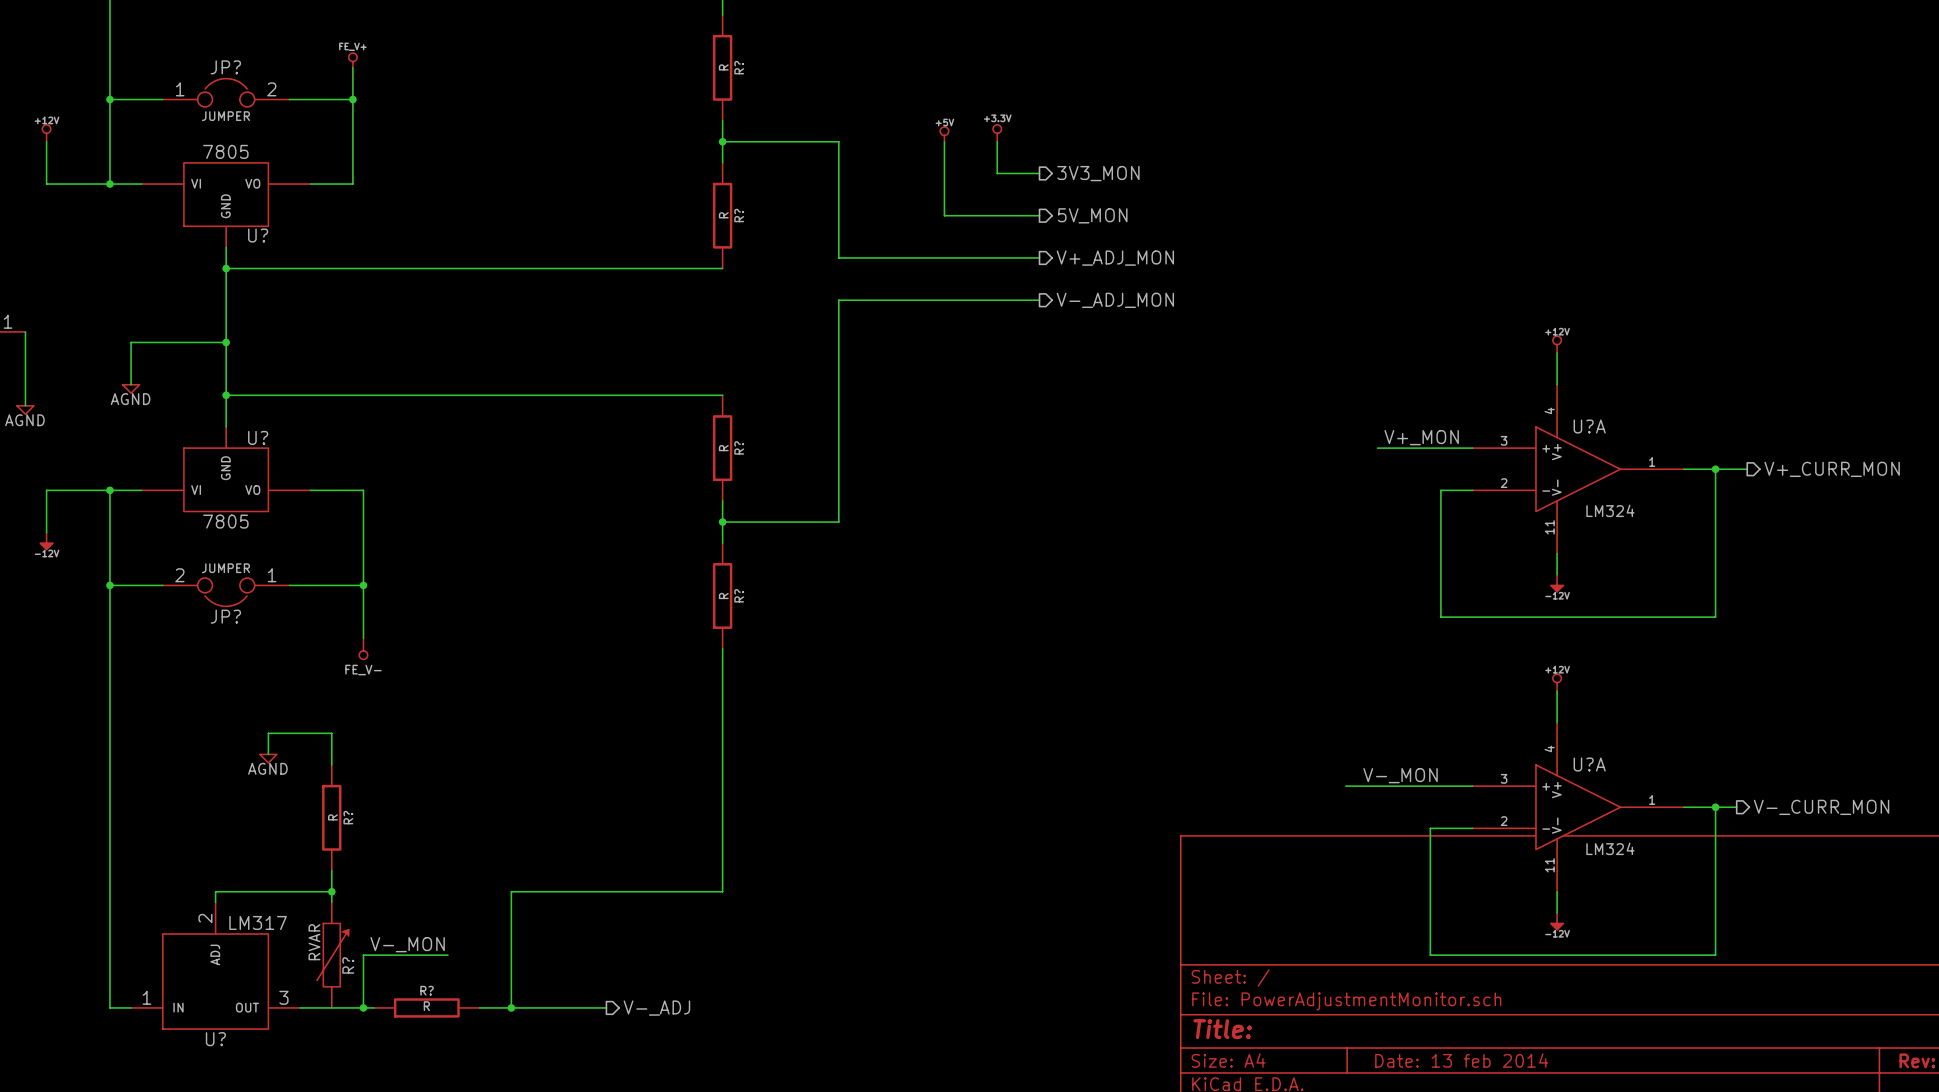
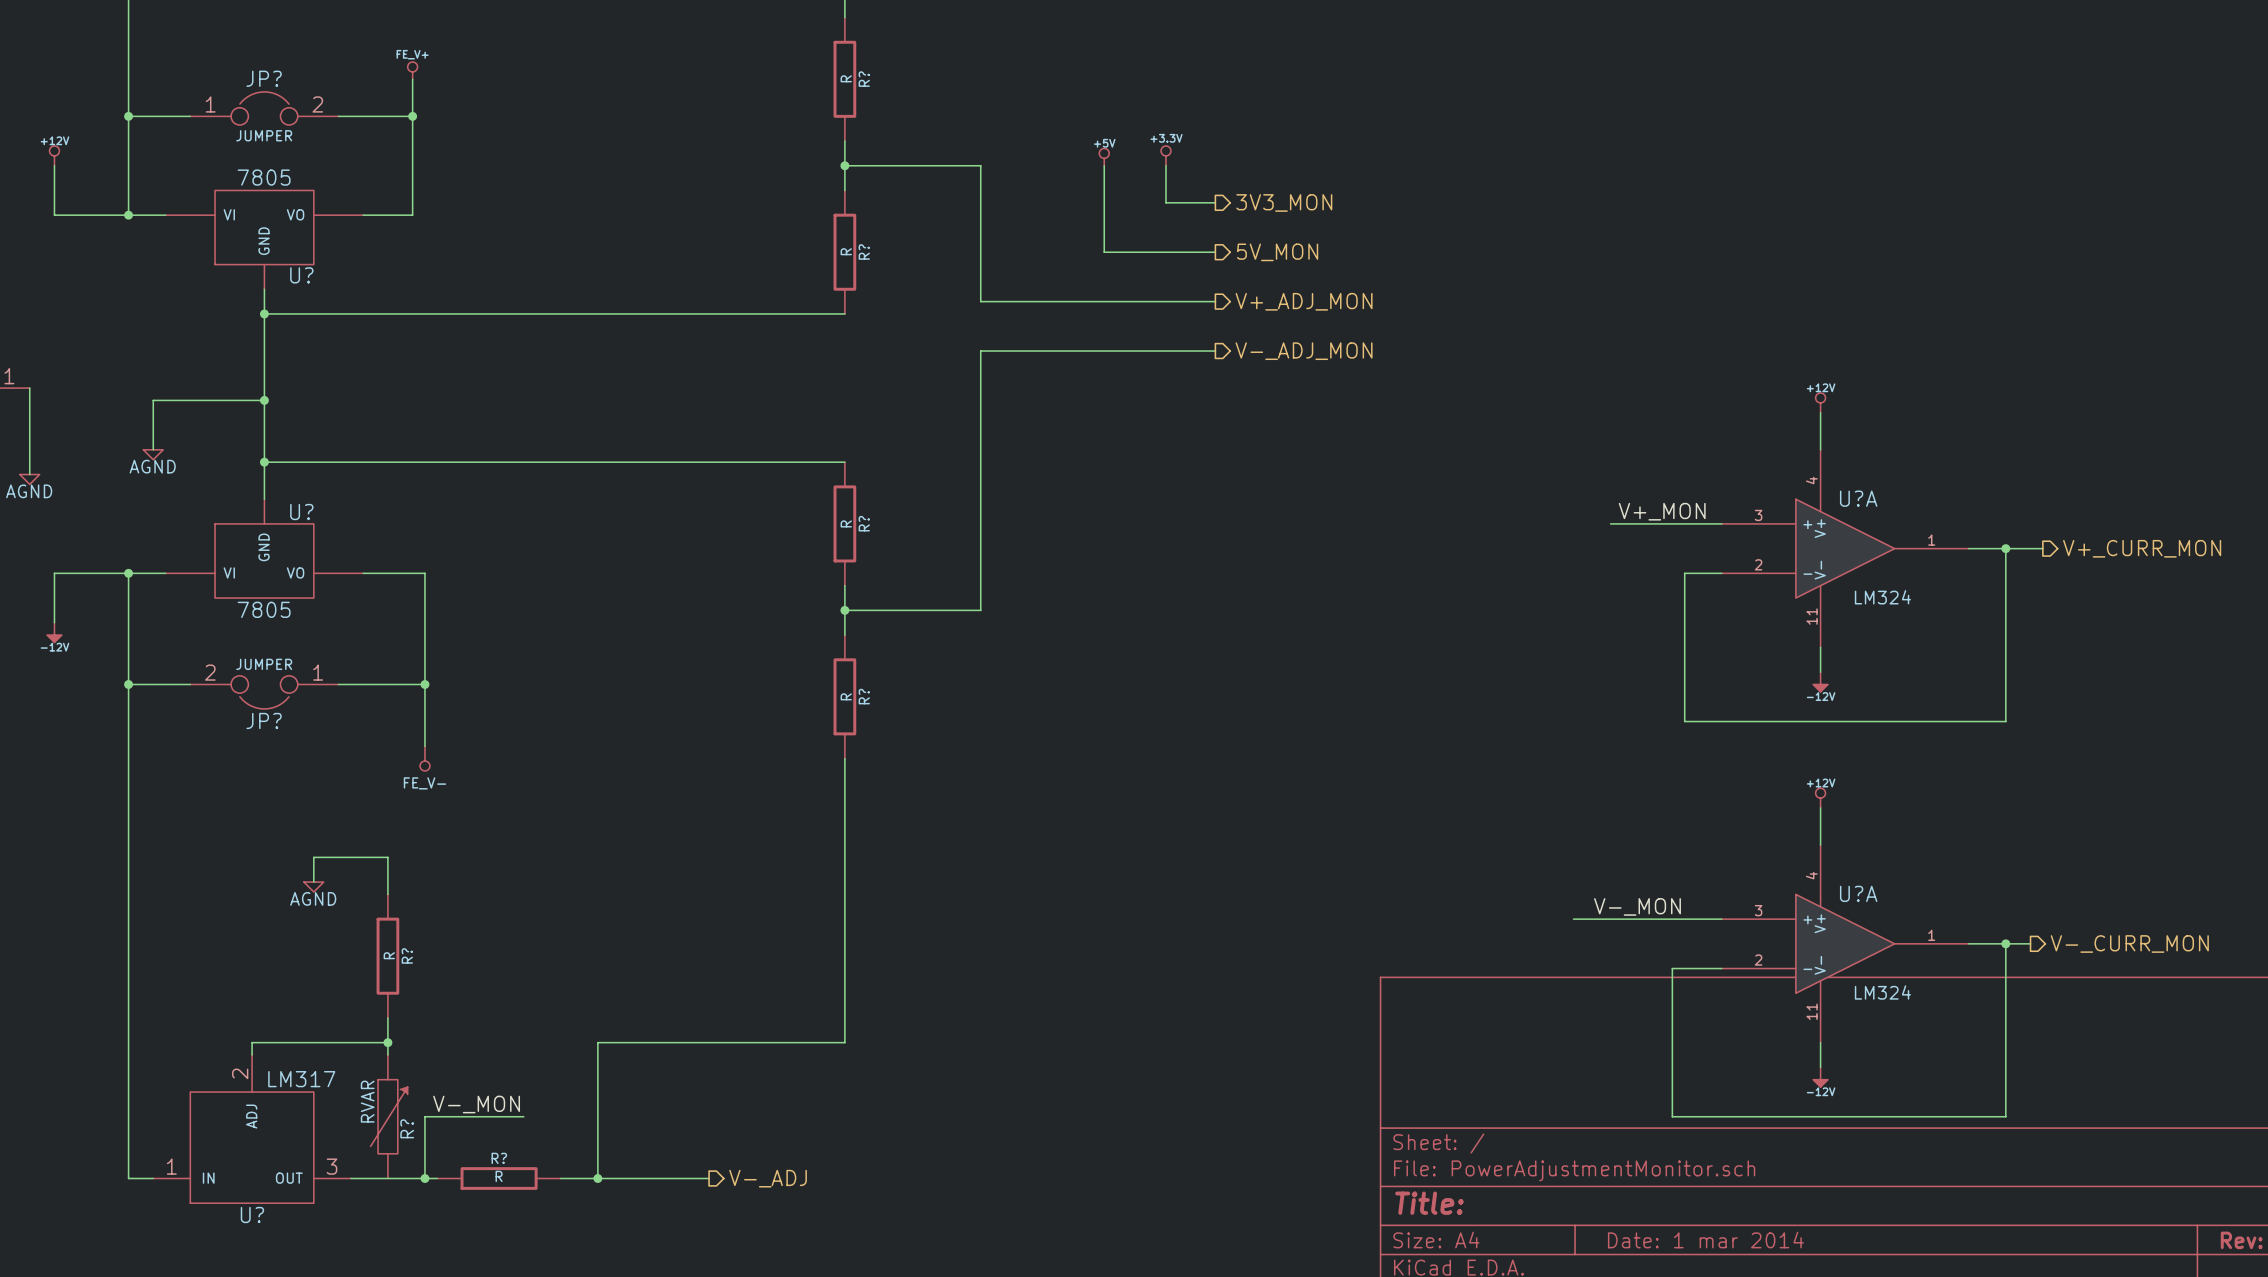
title block: Date: 13 feb 2014 (1461, 1060) -> Date: 1 mar 2014 (1705, 1240)

